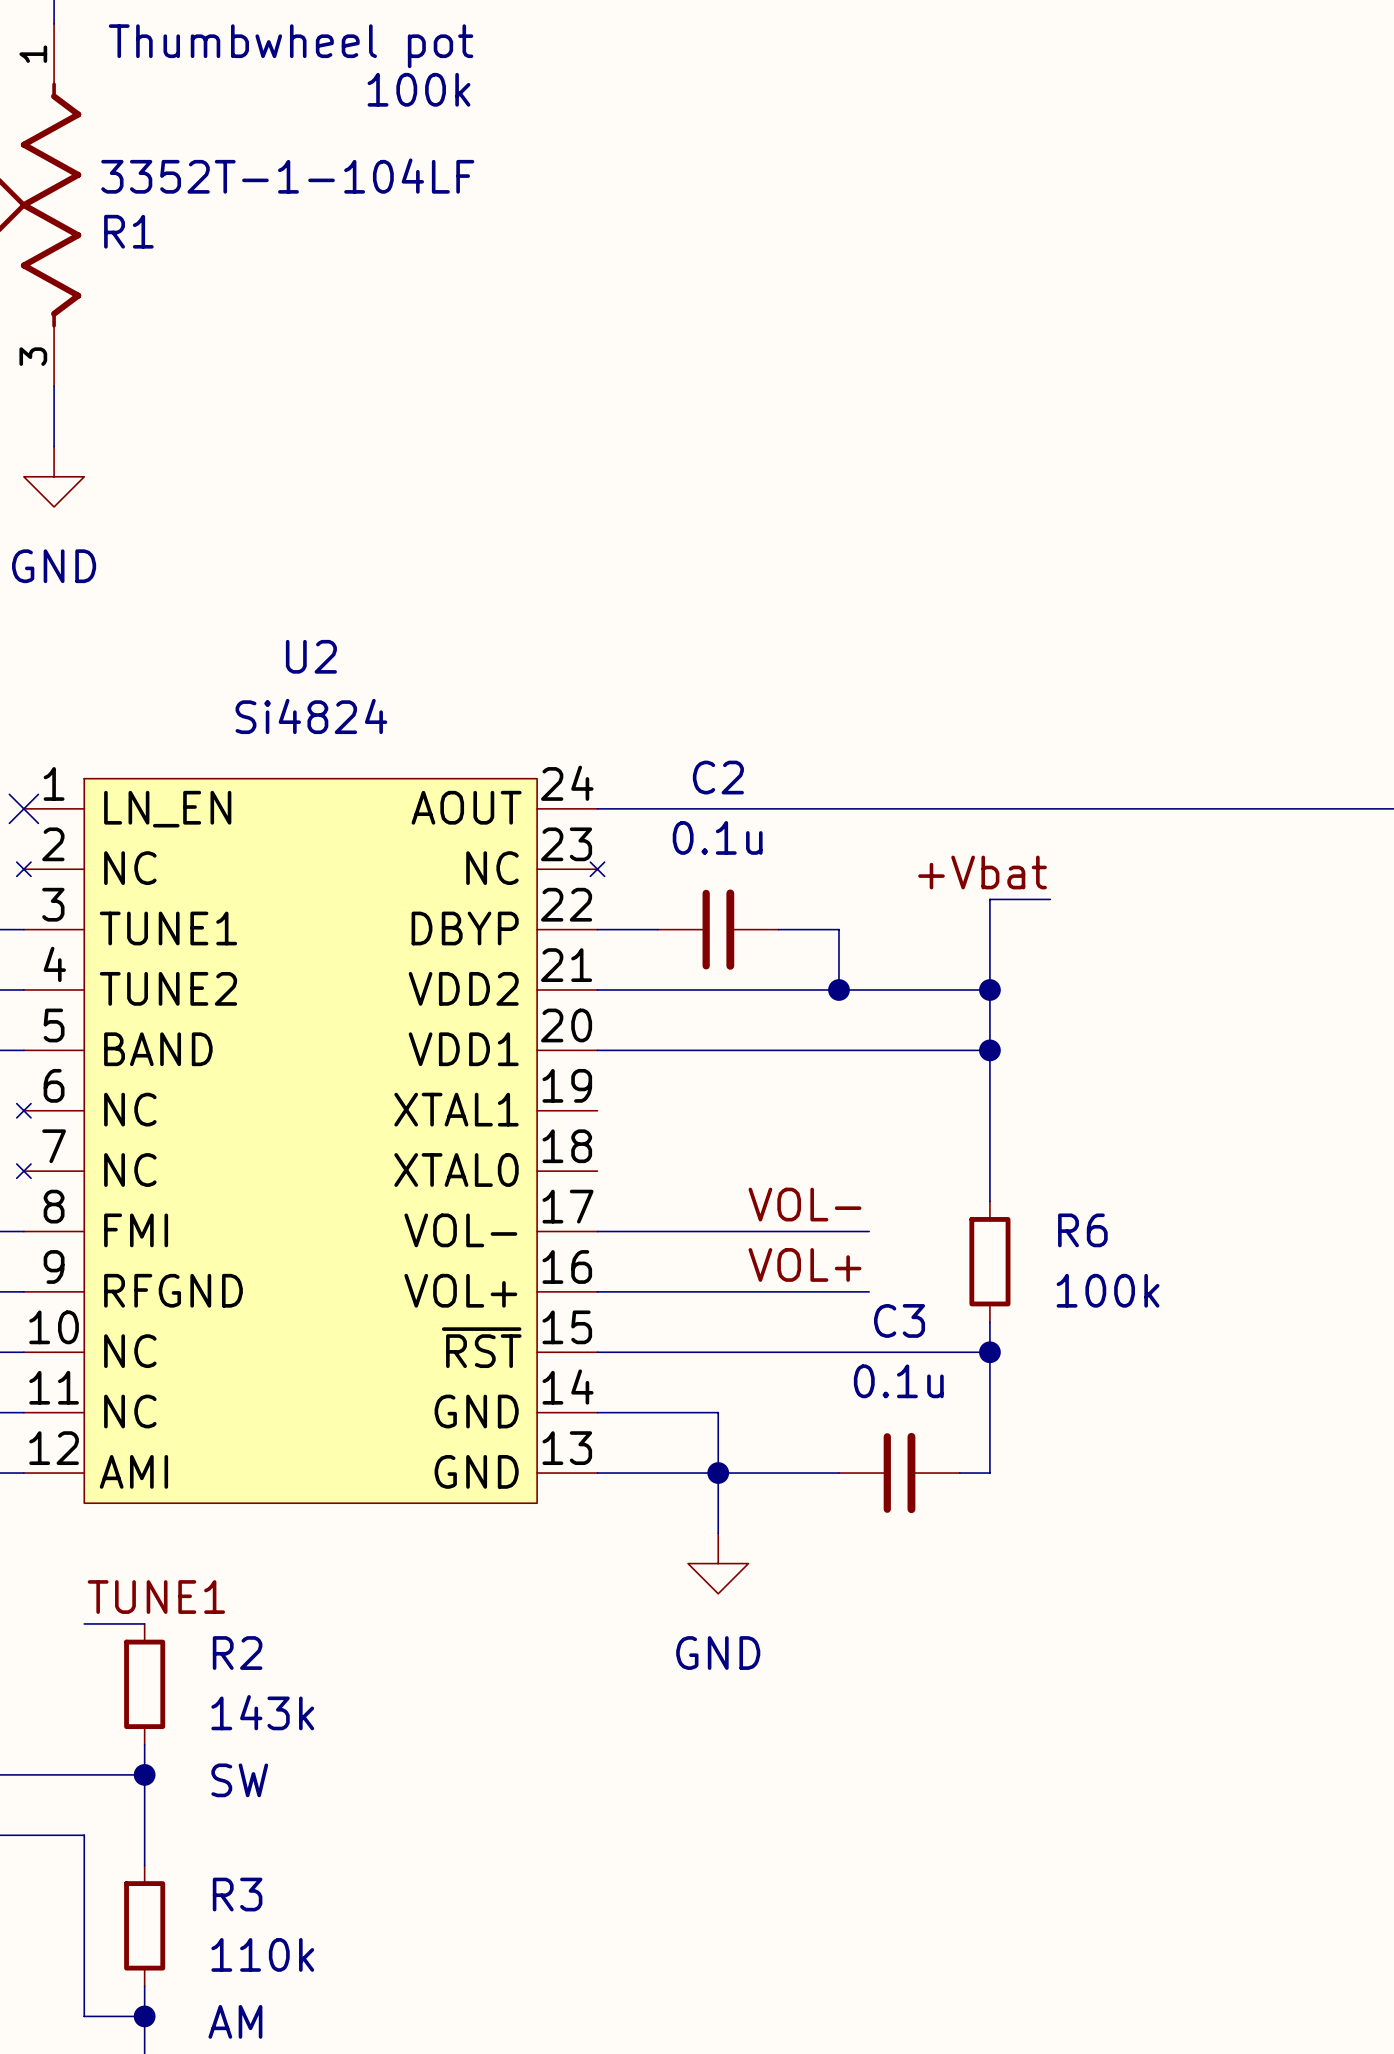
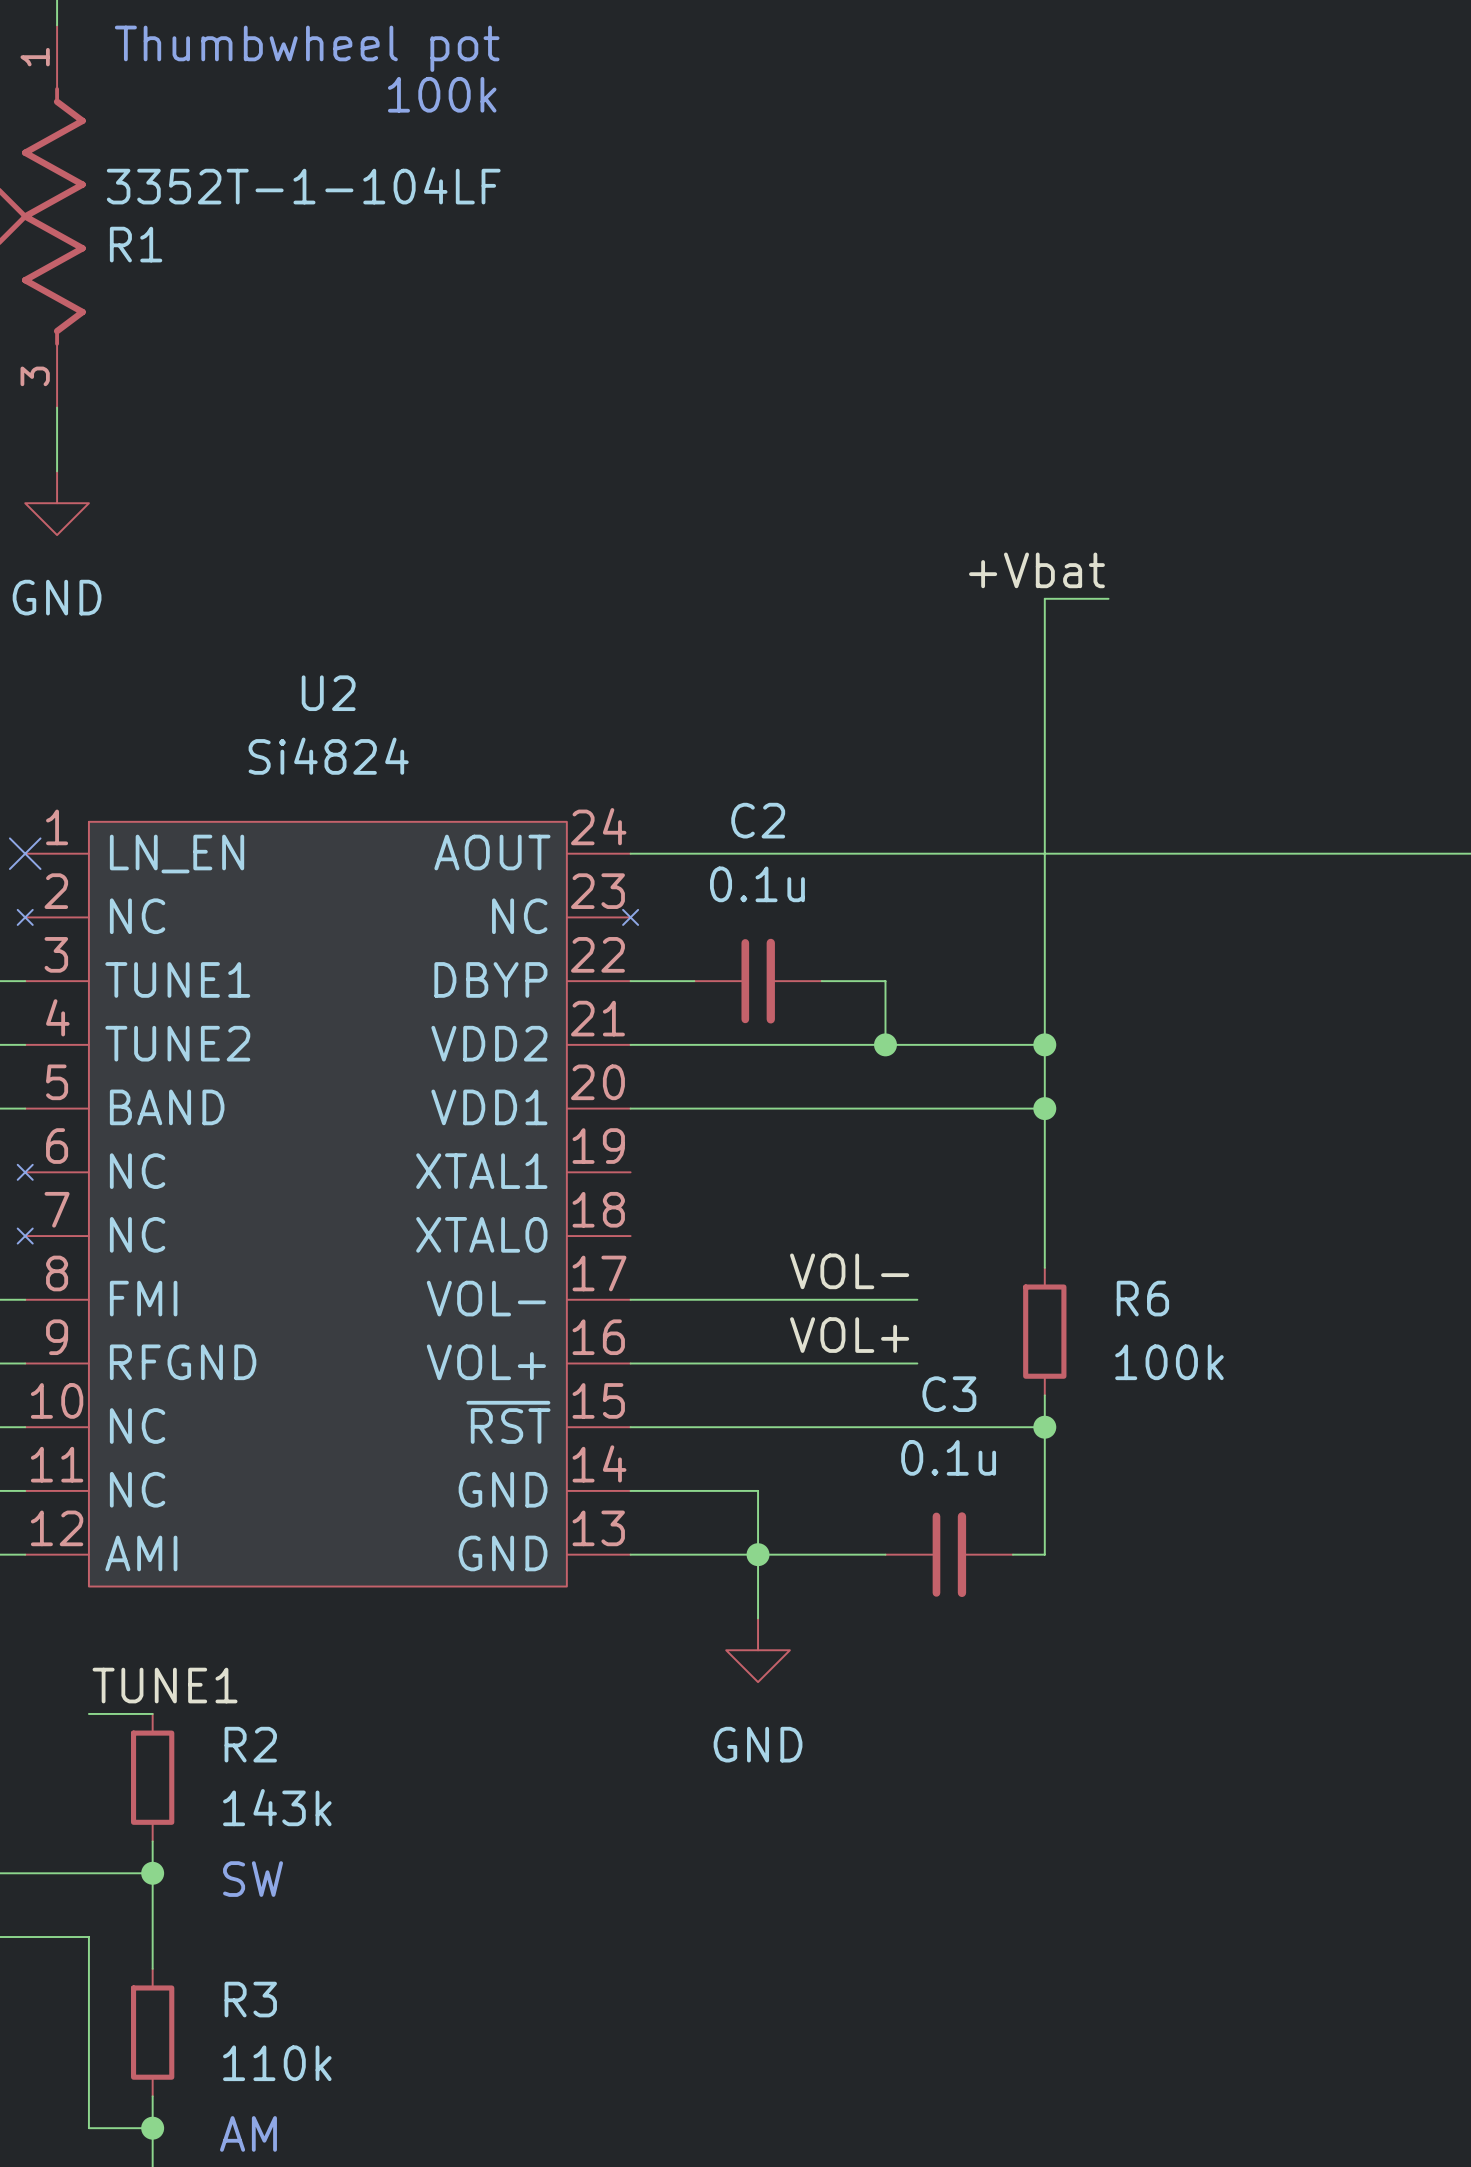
label position: +Vbat (982, 872) -> +Vbat (1036, 570)
wire: (989, 899) (1050, 899) -> (1044, 949) (1044, 598) (1108, 598)

